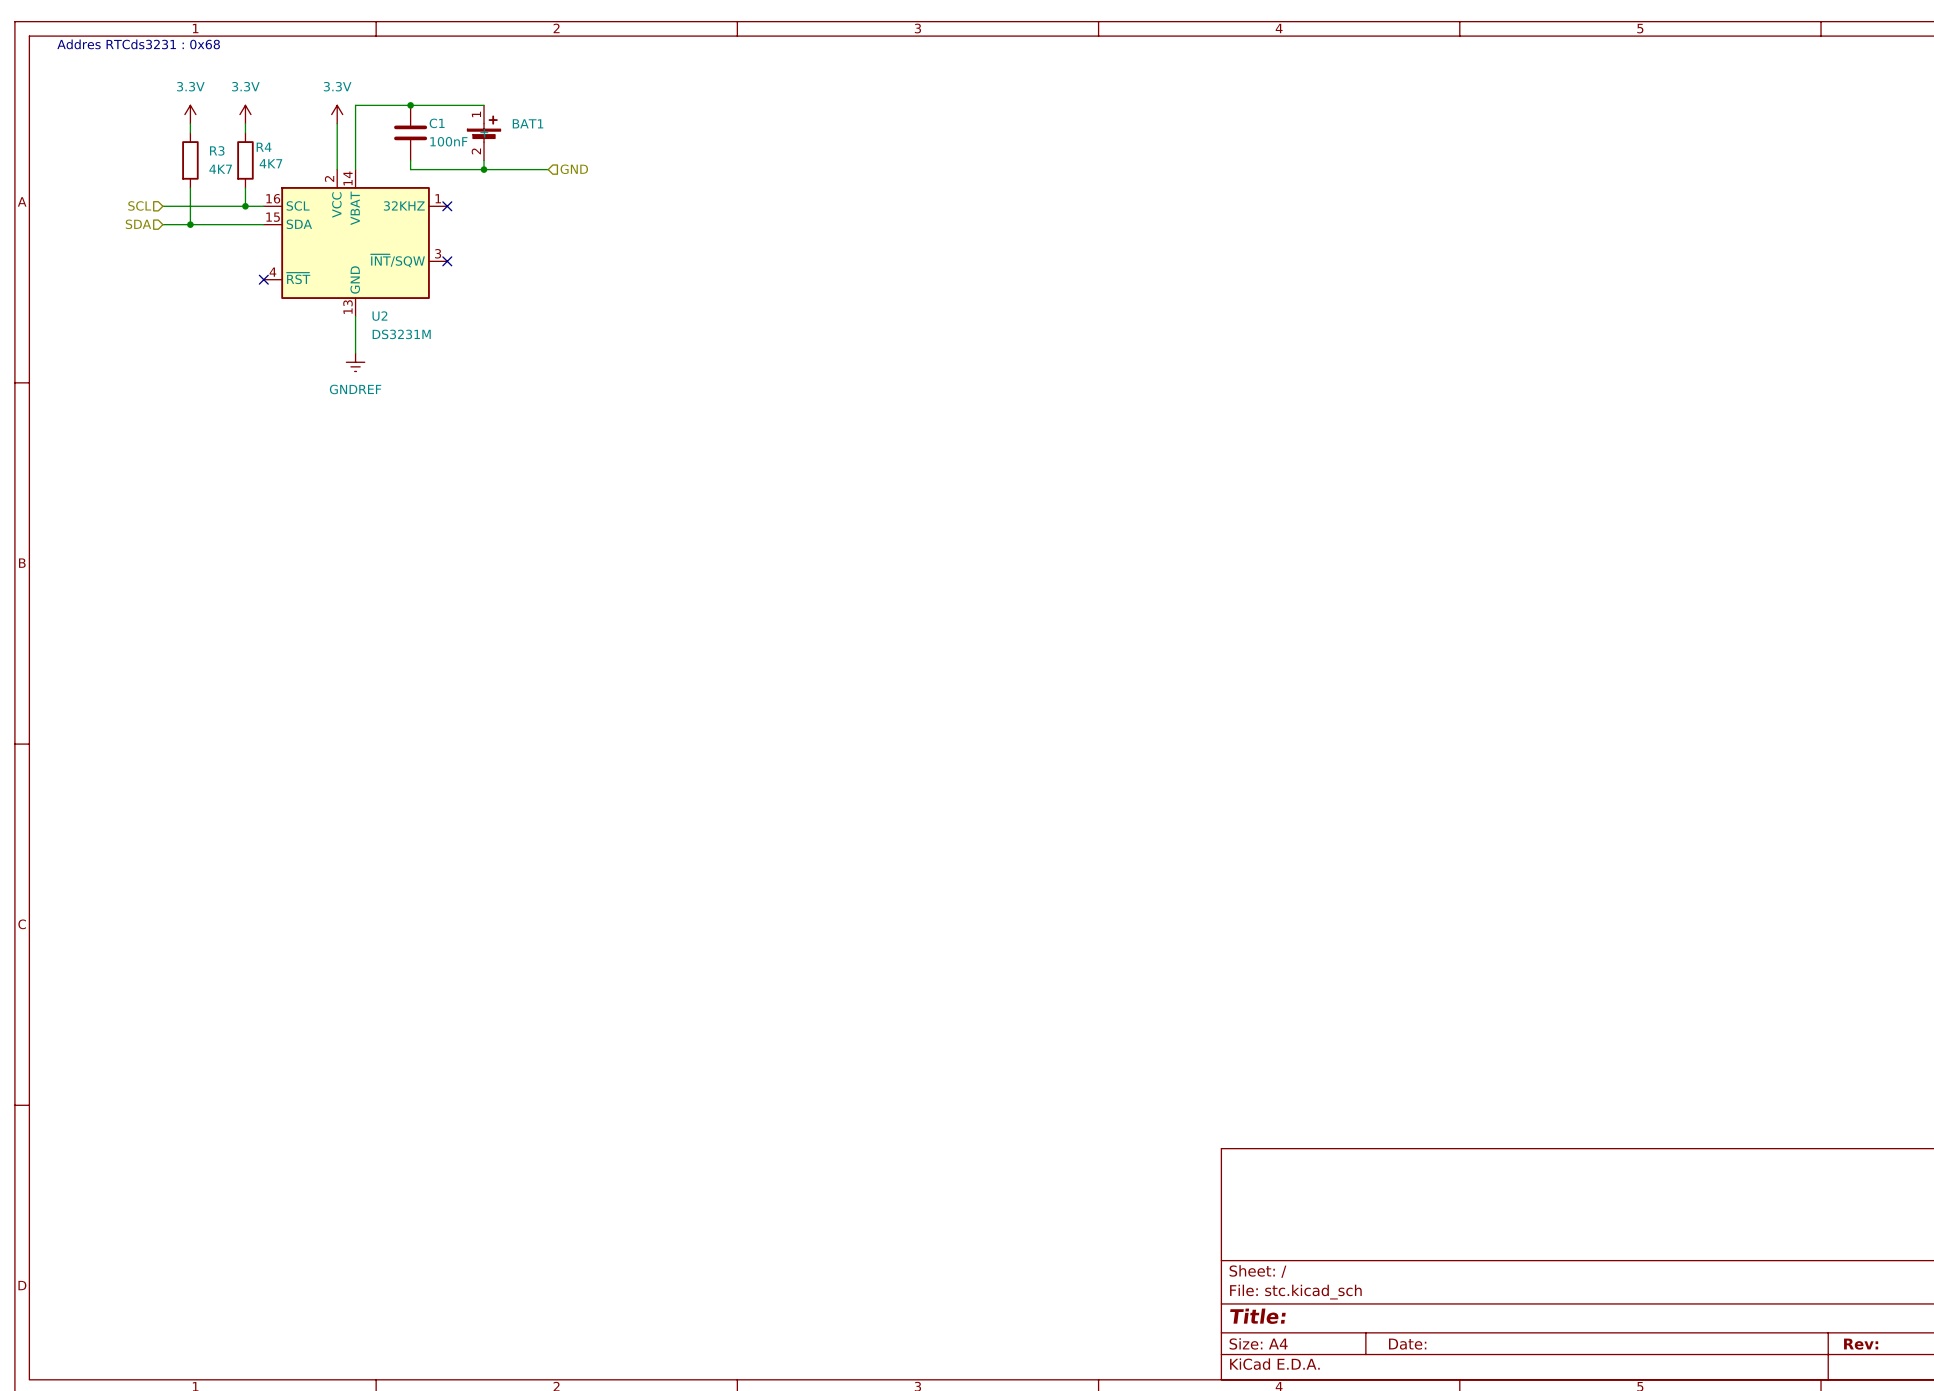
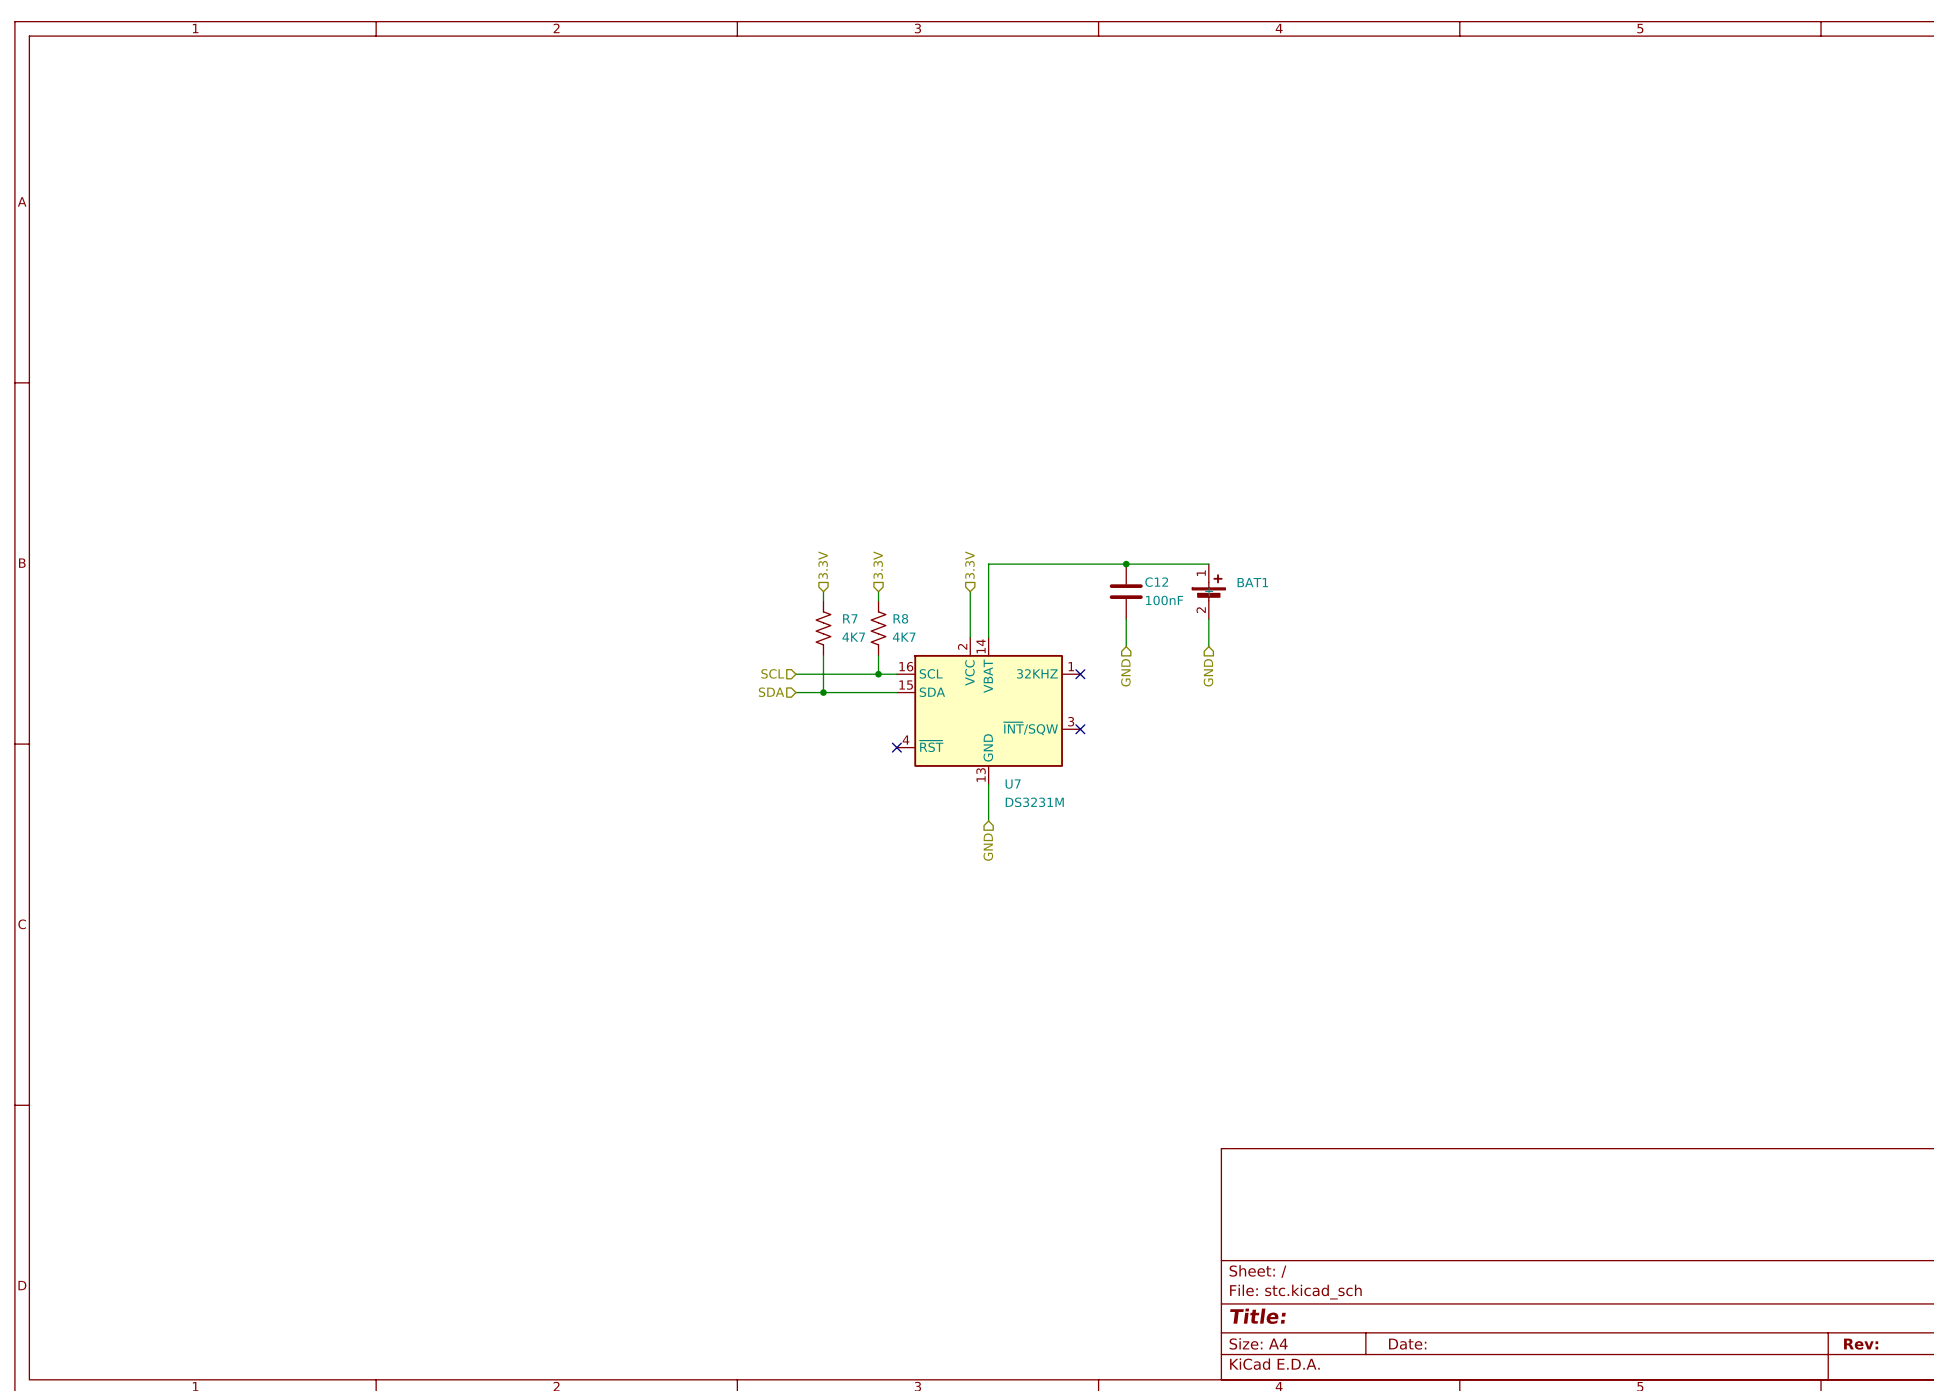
text: Addres RTCds3231 : 0x68 (138, 44) -> none
junction: (410, 105) -> none
wire: (484, 105) (355, 105) (355, 169) -> none
power symbol: 3.3V (190, 114) -> none
power symbol: 3.3V (245, 114) -> none
power symbol: 3.3V (337, 114) -> none
wire: (190, 123) (190, 132) -> none
wire: (245, 123) (245, 132) -> none
wire: (337, 123) (337, 169) -> none
C1: 100nF (410, 132) -> none
BAT1 position: (484, 132) -> (1208, 591)
R3: 4K7 (190, 160) -> none
R4: 4K7 (245, 160) -> none
wire: (410, 160) (410, 169) (548, 169) -> none
wire: (484, 160) (484, 169) -> none
junction: (484, 169) -> none
hierarchical label: GND (574, 169) -> none
wire: (190, 187) (190, 224) -> none
wire: (245, 187) (245, 206) -> none
hierarchical label: SCL (139, 205) -> none
wire: (162, 206) (263, 206) -> none
junction: (245, 206) -> none
no-connect mark: (447, 206) -> none
hierarchical label: SDA (138, 224) -> none
wire: (162, 224) (263, 224) -> none
junction: (190, 224) -> none
U2: DS3231M (355, 243) -> none
no-connect mark: (447, 261) -> none
no-connect mark: (263, 279) -> none
wire: (355, 316) (355, 353) -> none
power symbol: GNDREF (355, 362) -> none
junction: none -> (1126, 564)
wire: none -> (1208, 564) (988, 564) (988, 637)
hierarchical label: none -> 3.3V (823, 565)
hierarchical label: none -> 3.3V (878, 565)
hierarchical label: none -> 3.3V (969, 565)
wire: none -> (823, 591) (823, 600)
wire: none -> (878, 591) (878, 600)
wire: none -> (970, 591) (970, 637)
C12: none -> 100nF (1126, 591)
wire: none -> (1126, 619) (1126, 646)
wire: none -> (1208, 619) (1208, 646)
R7: none -> 4K7 (823, 628)
R8: none -> 4K7 (878, 628)
wire: none -> (823, 655) (823, 692)
wire: none -> (878, 655) (878, 674)
hierarchical label: none -> GND (1125, 672)
hierarchical label: none -> GND (1208, 672)
hierarchical label: none -> SCL (772, 673)
wire: none -> (795, 674) (896, 674)
junction: none -> (878, 674)
no-connect mark: none -> (1080, 674)
hierarchical label: none -> SDA (771, 692)
wire: none -> (795, 692) (896, 692)
junction: none -> (823, 692)
U7: none -> DS3231M (988, 710)
no-connect mark: none -> (1080, 729)
no-connect mark: none -> (896, 747)
wire: none -> (988, 784) (988, 821)
hierarchical label: none -> GND (988, 847)

